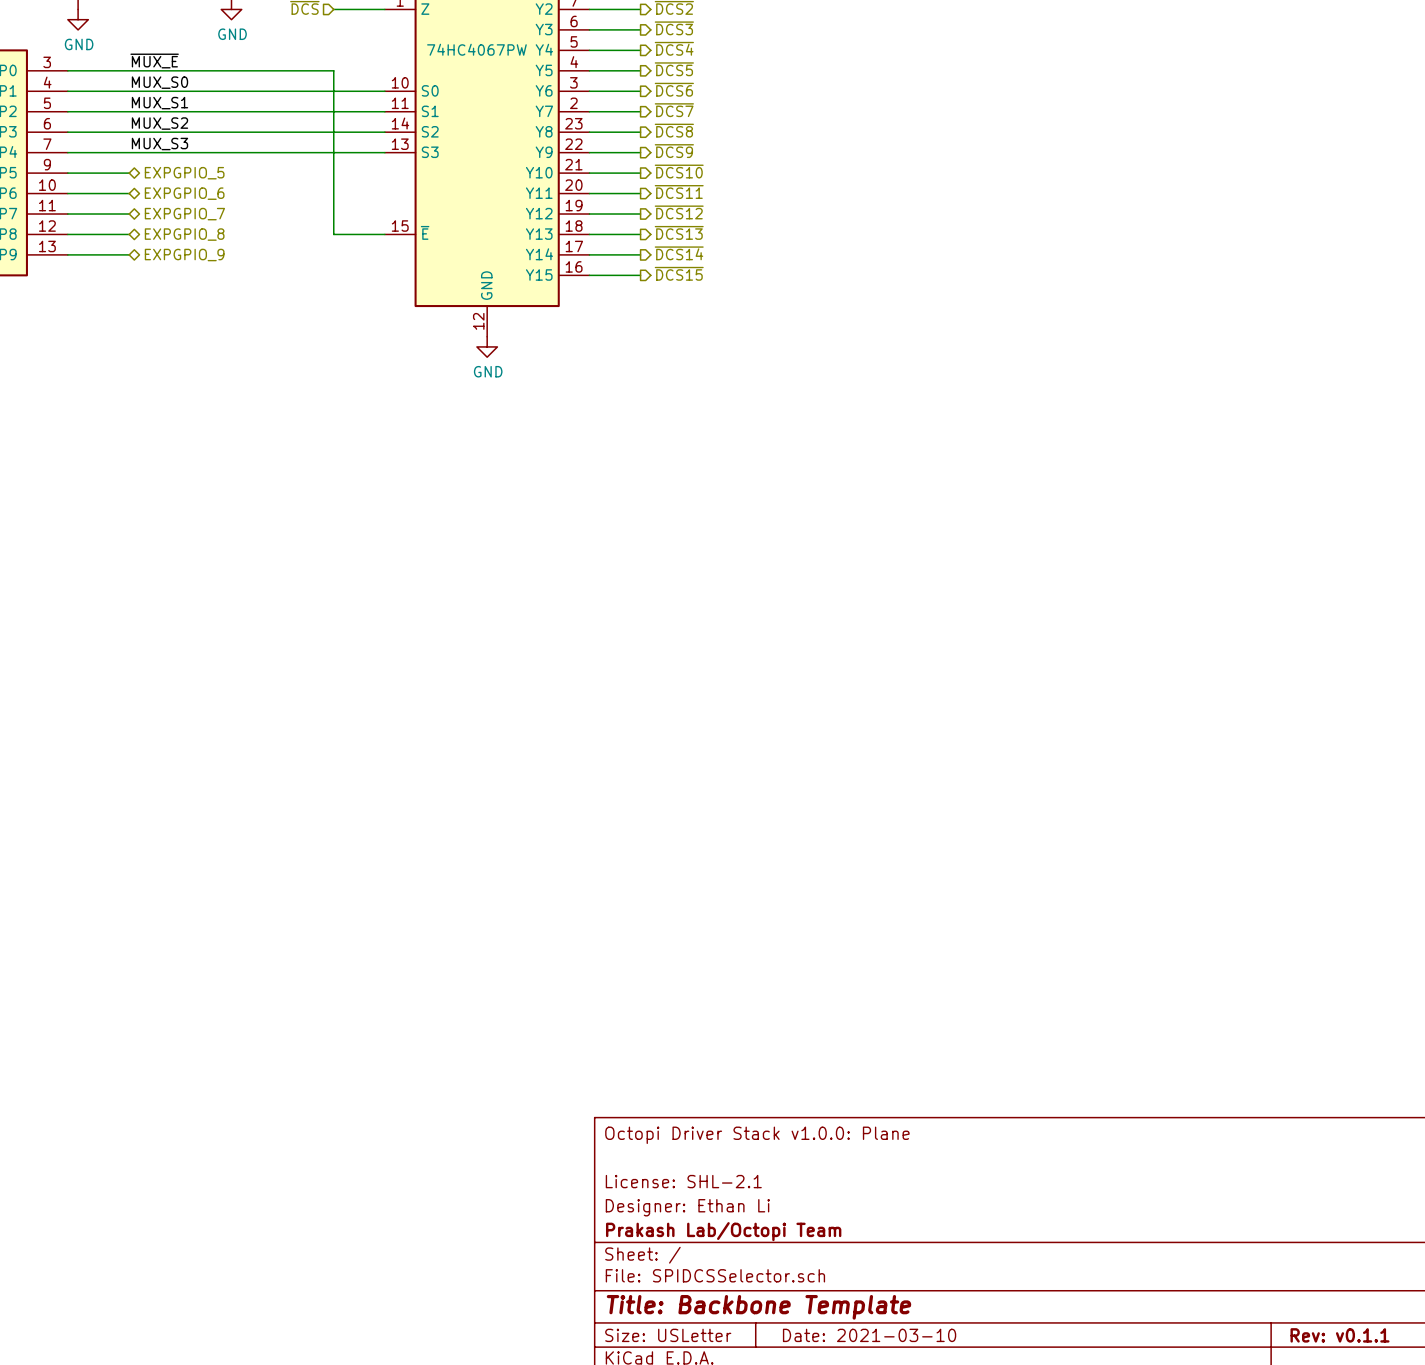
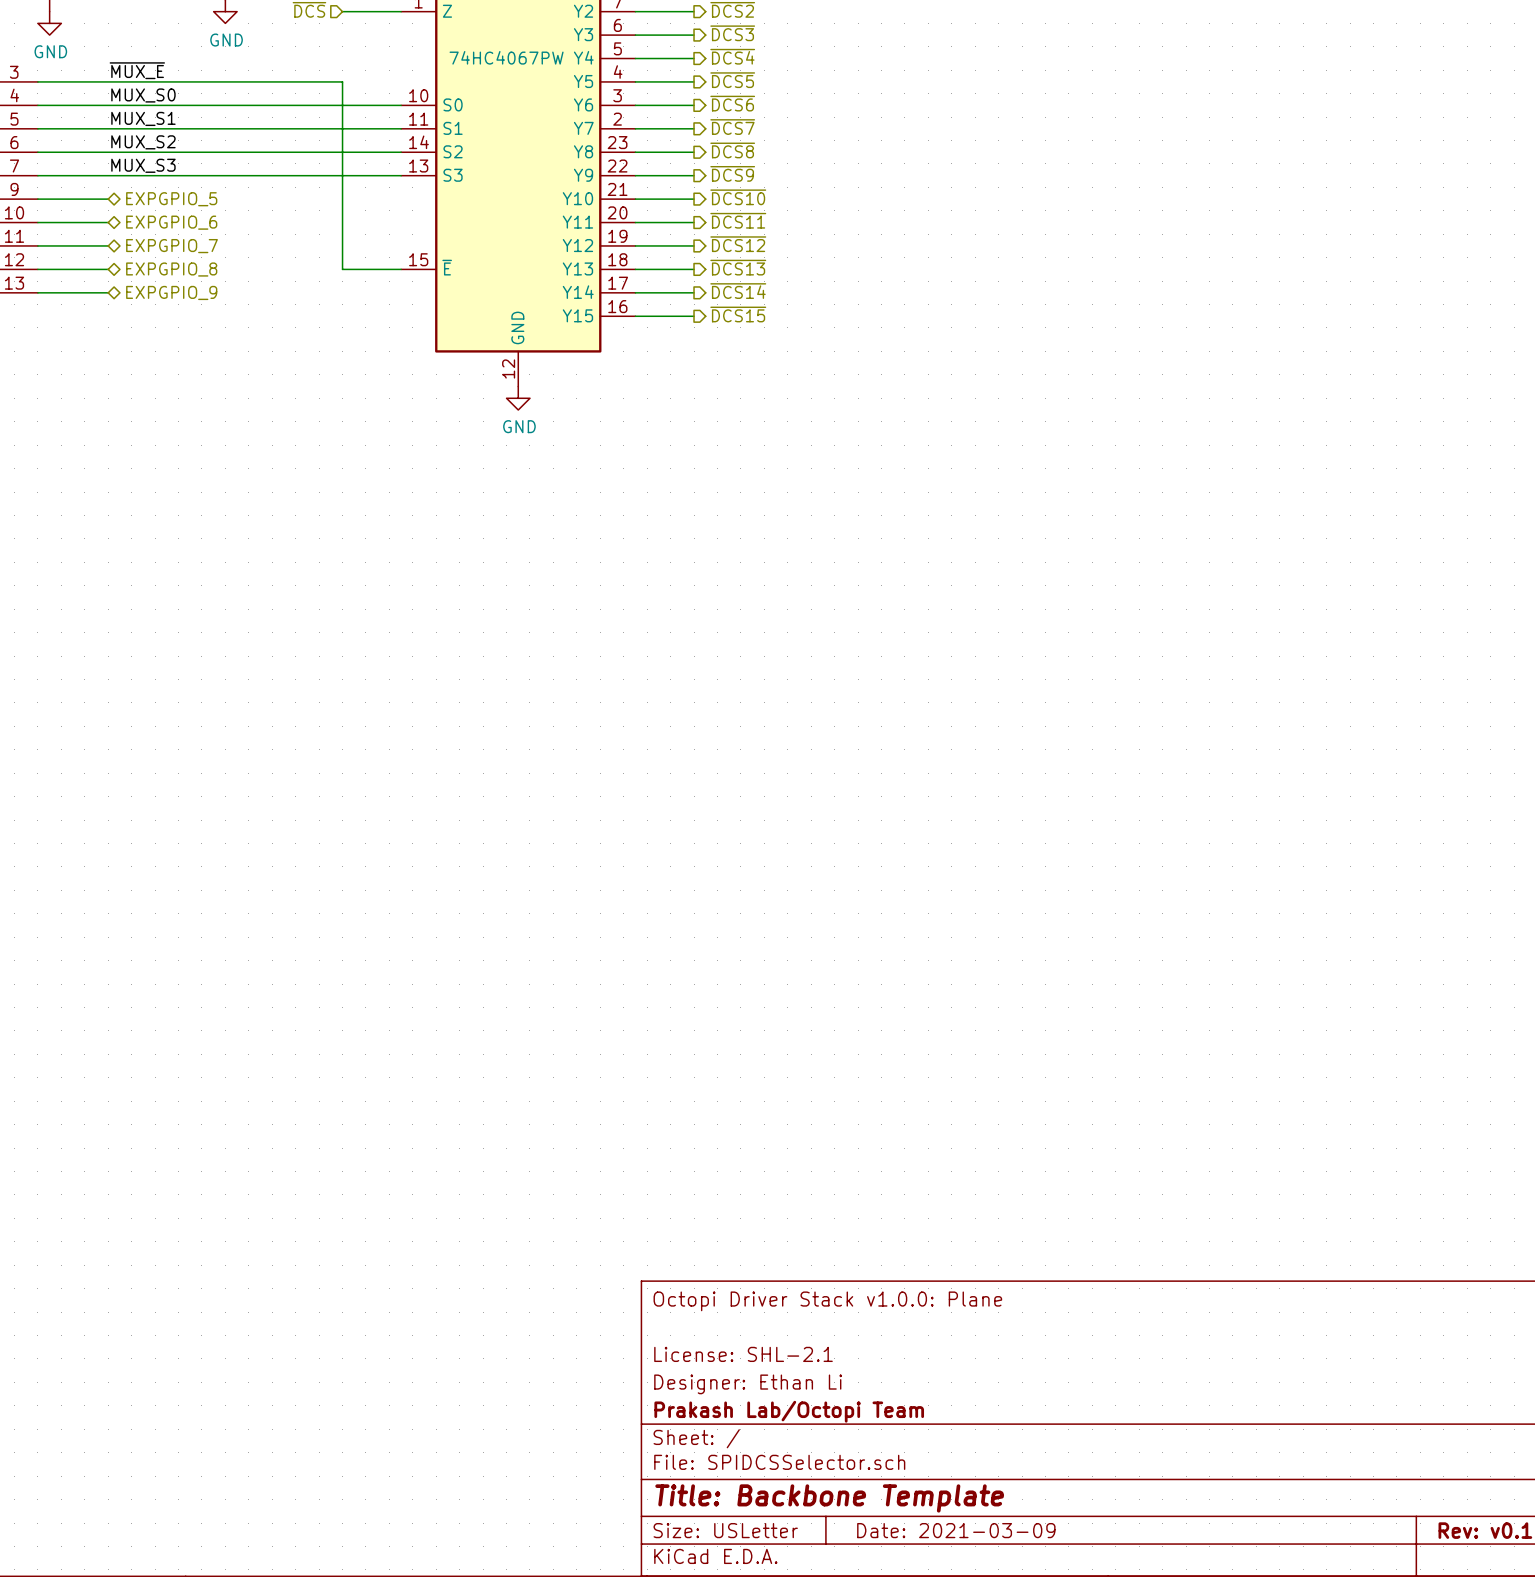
title block: Date: 2021-03-10 (869, 1335) -> Date: 2021-03-09 (956, 1530)

